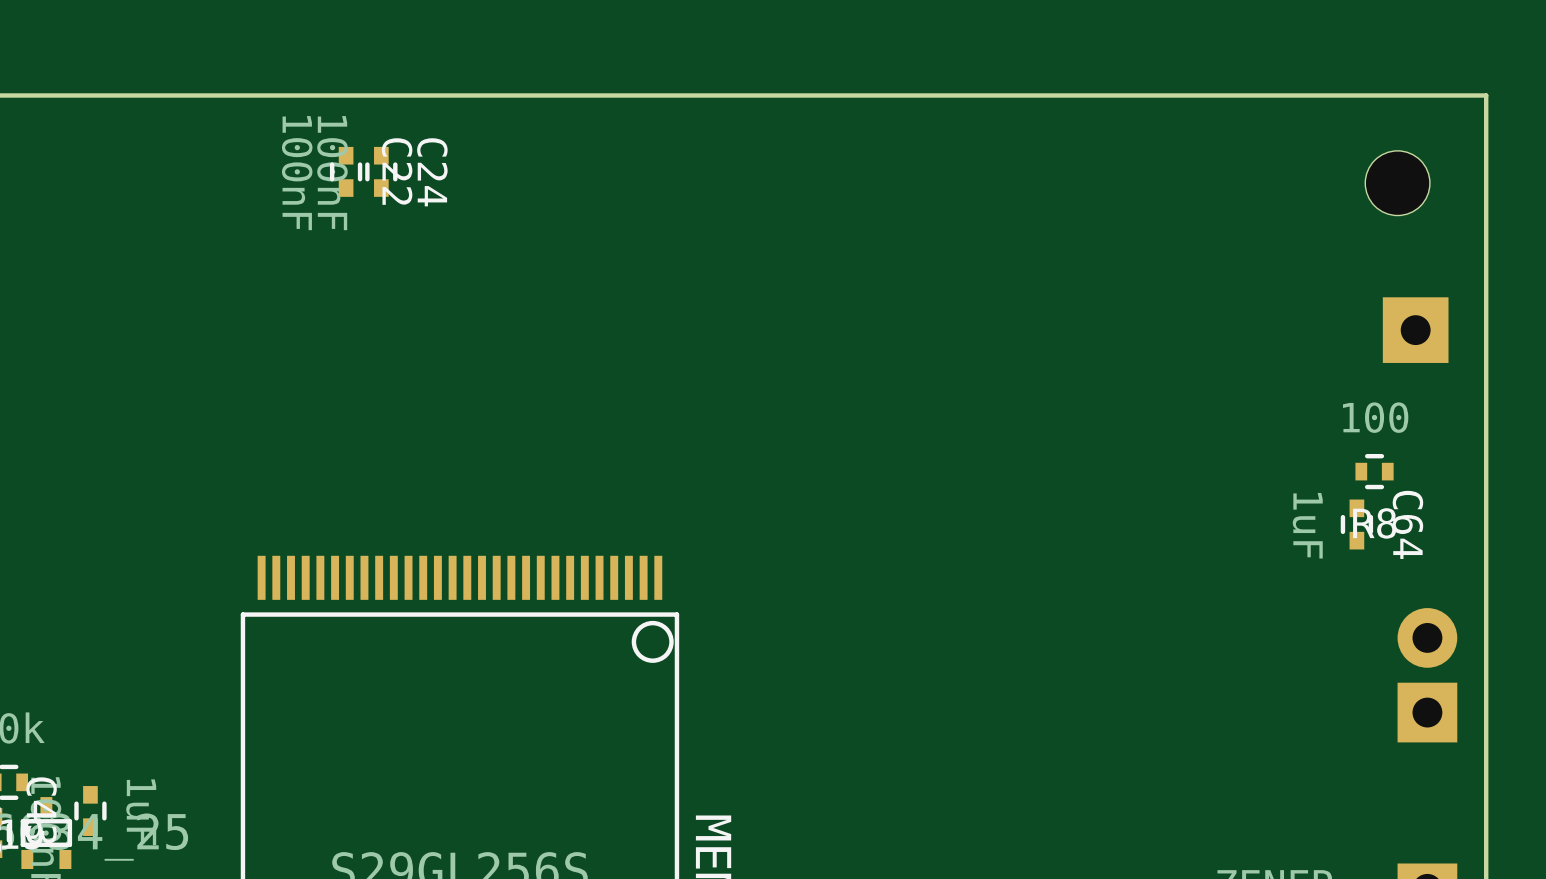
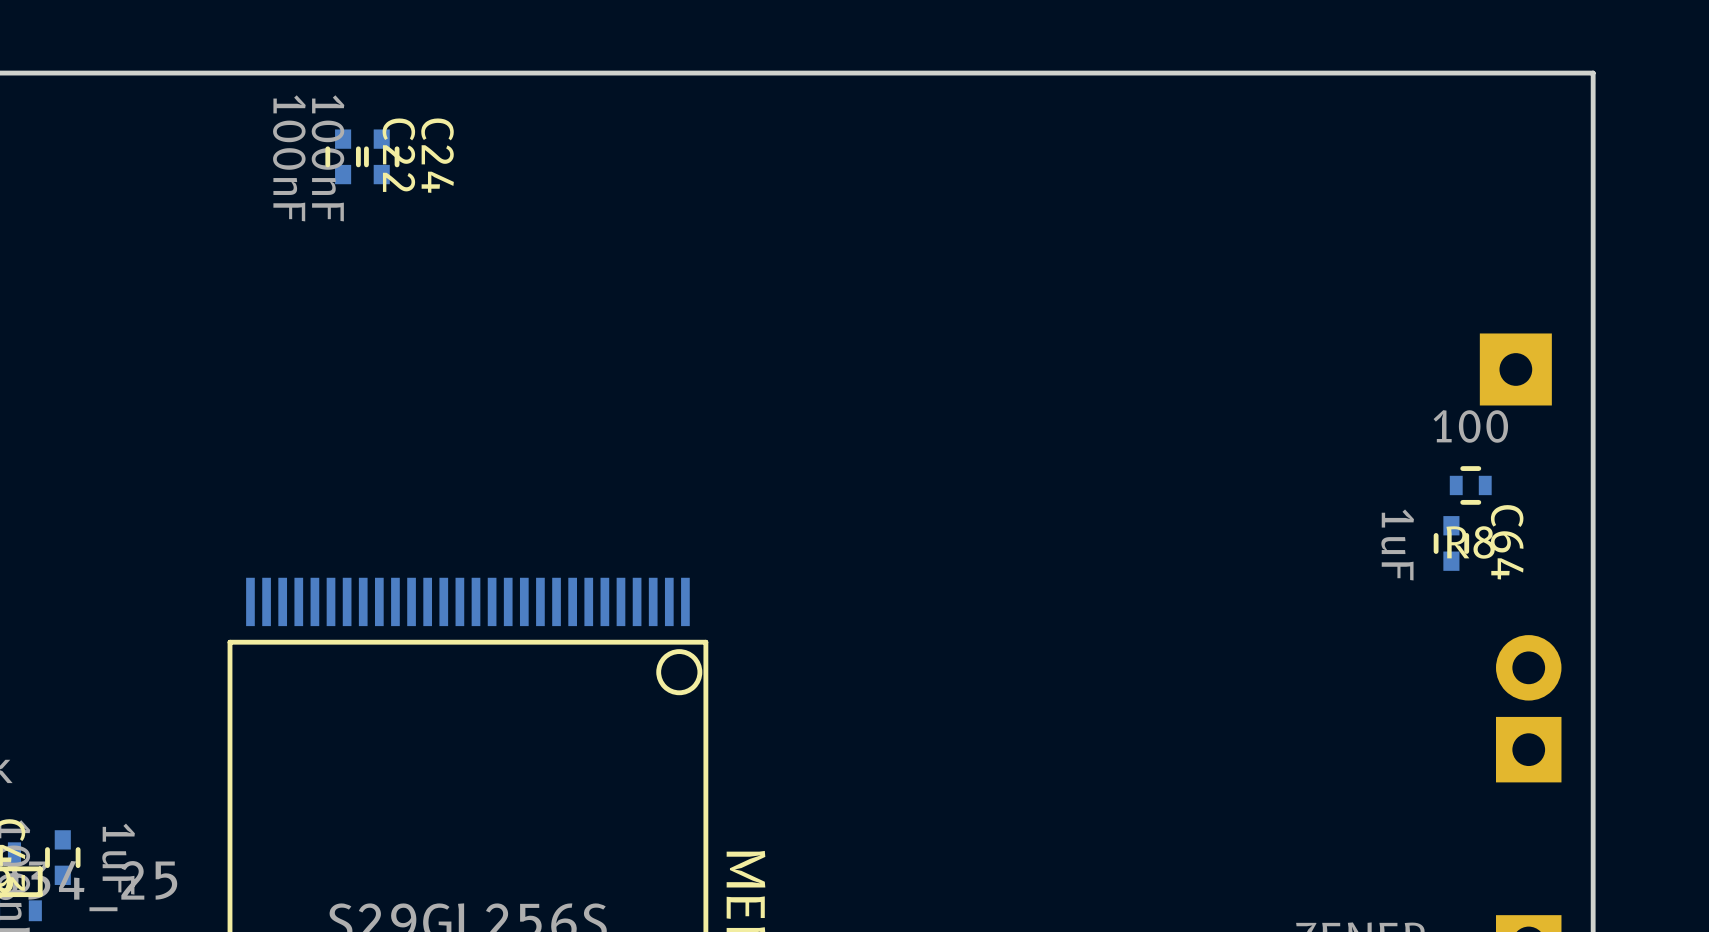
part: (1397, 183) -> none
part position: (1415, 330) -> (1515, 369)

